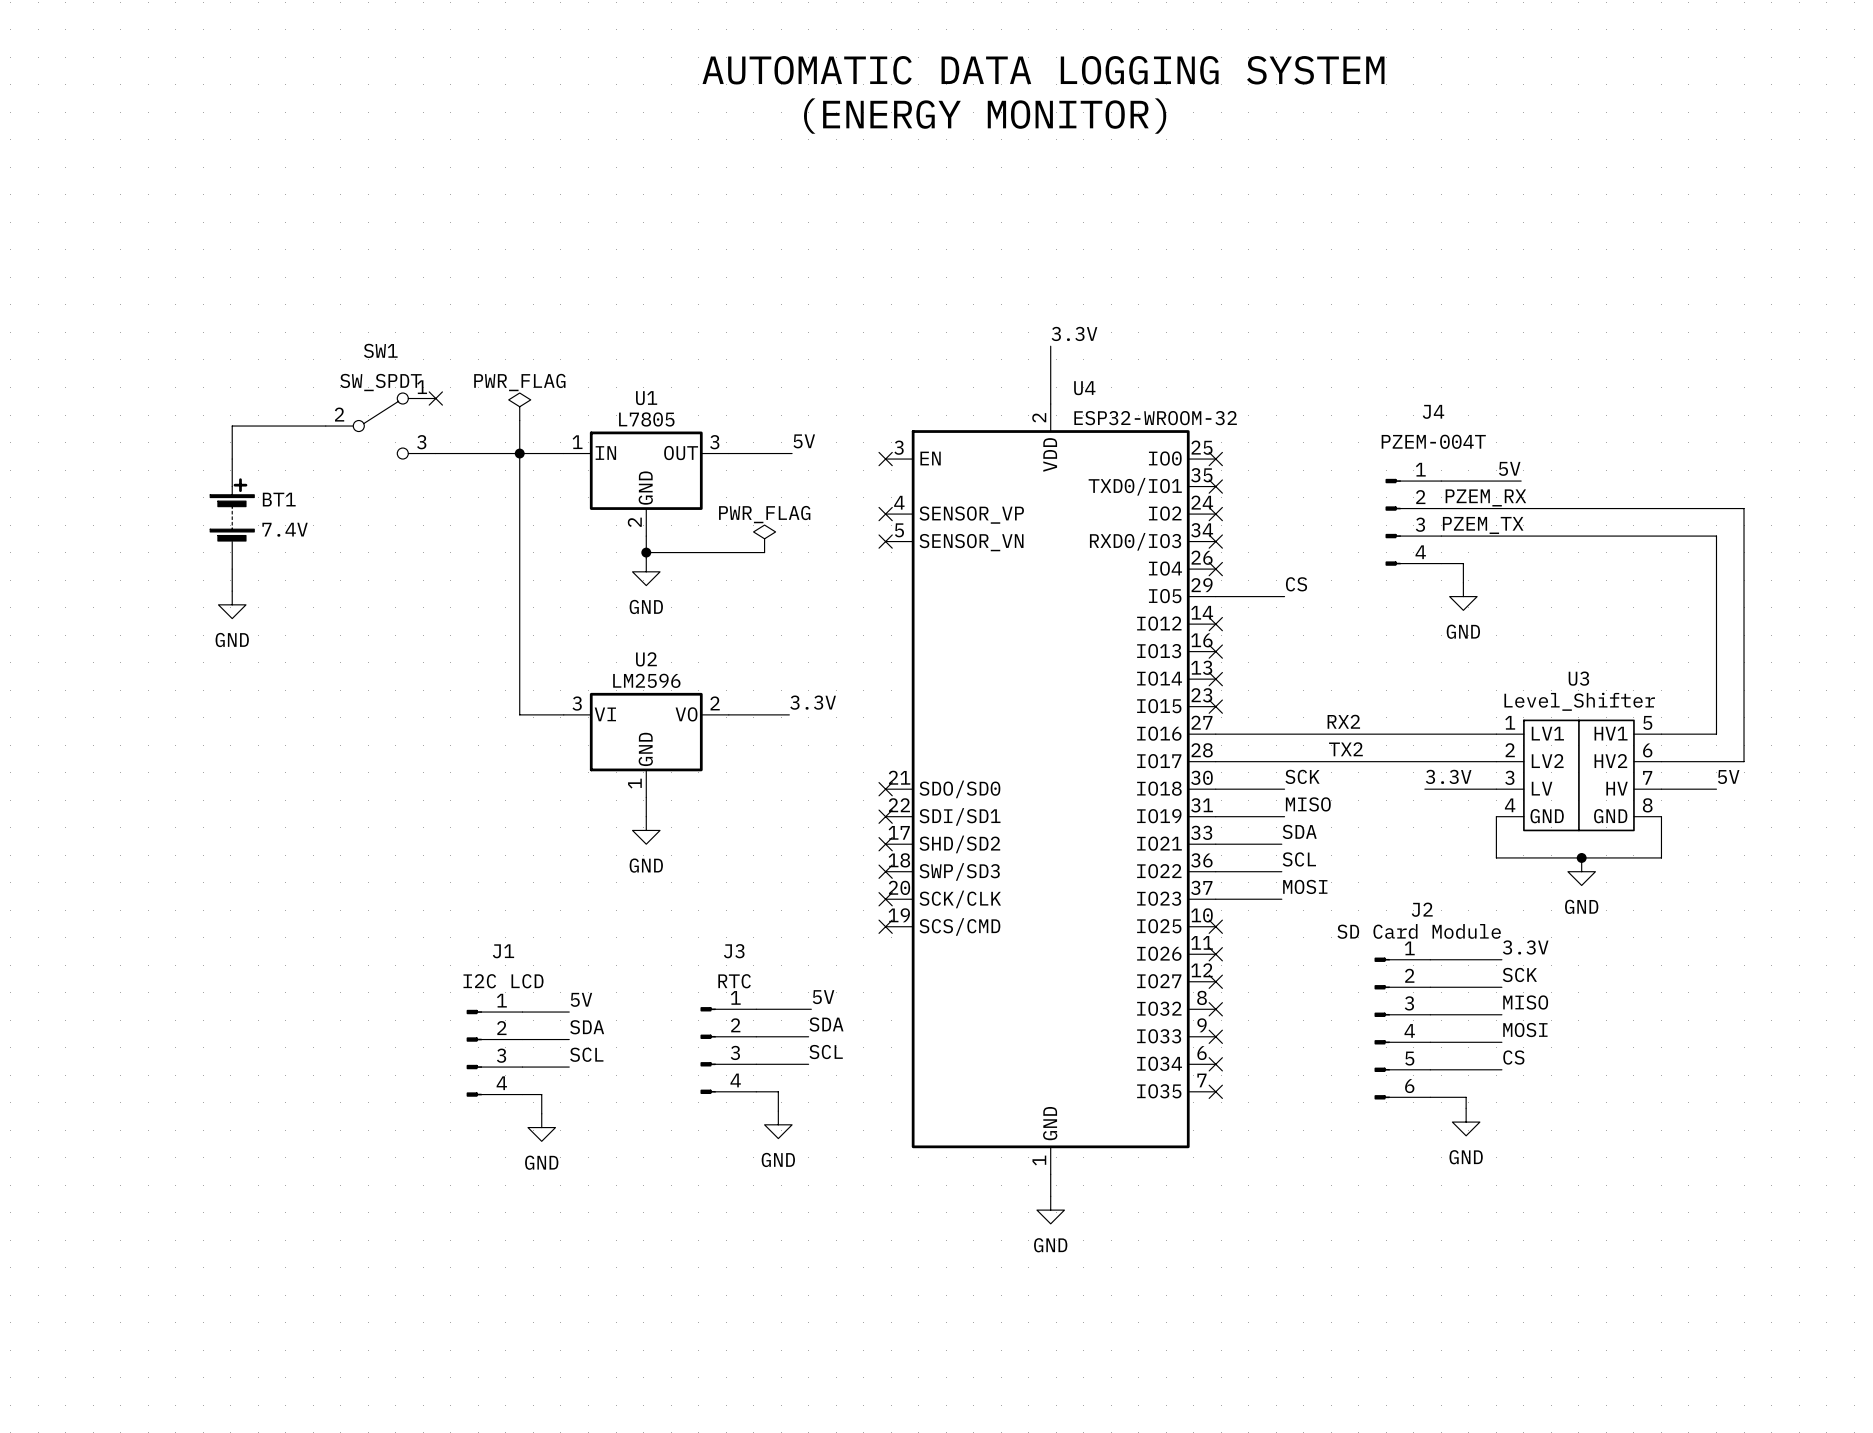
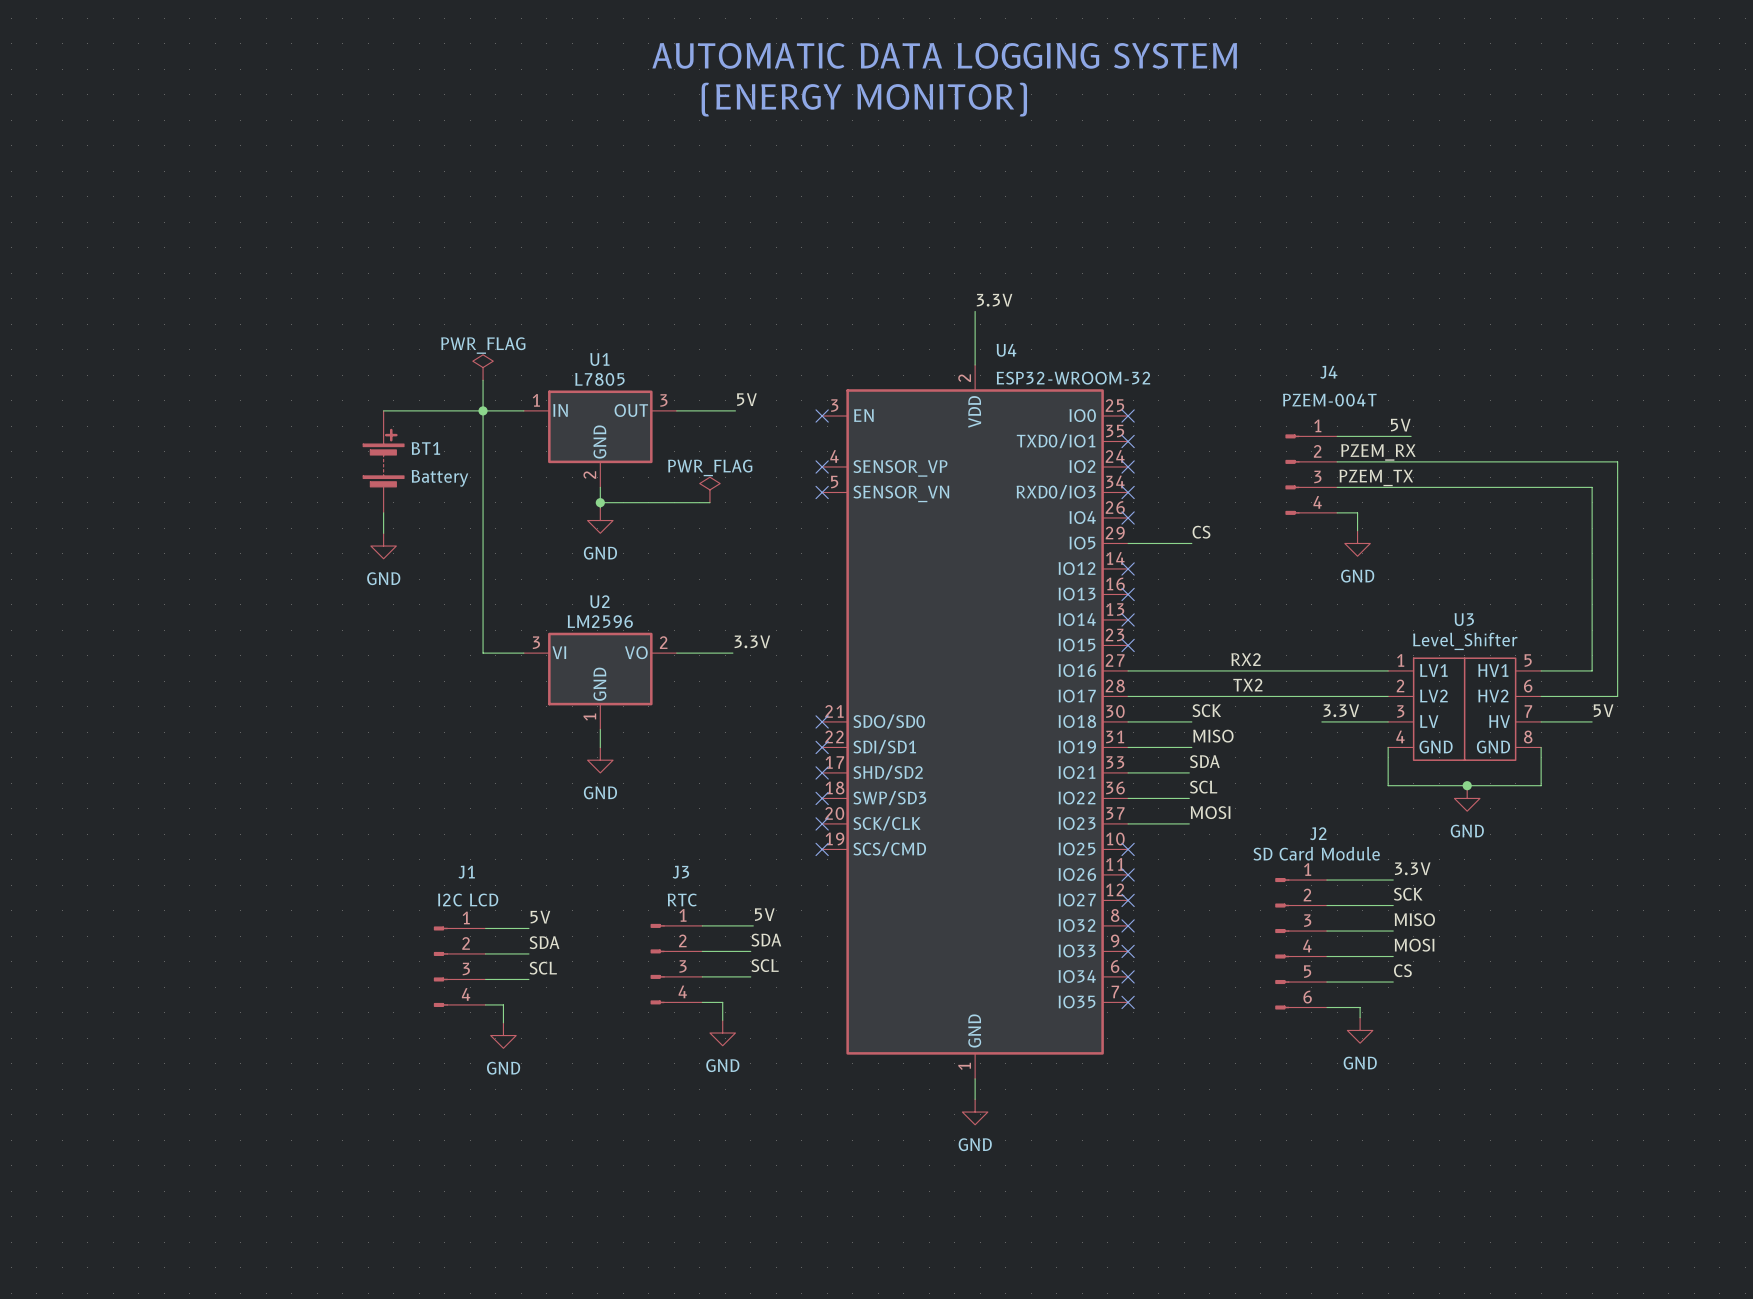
no-connect mark: (435, 398) -> none
wire: (325, 426) (232, 426) (232, 459) -> none
SW1: SW_SPDT (380, 426) -> none
BT1 position: (232, 514) -> (383, 461)
BT1 value: 7.4V (285, 529) -> Battery (439, 478)
wire: (232, 569) (232, 591) -> (383, 512) (383, 533)
power symbol position: GND (232, 604) -> GND (383, 546)

